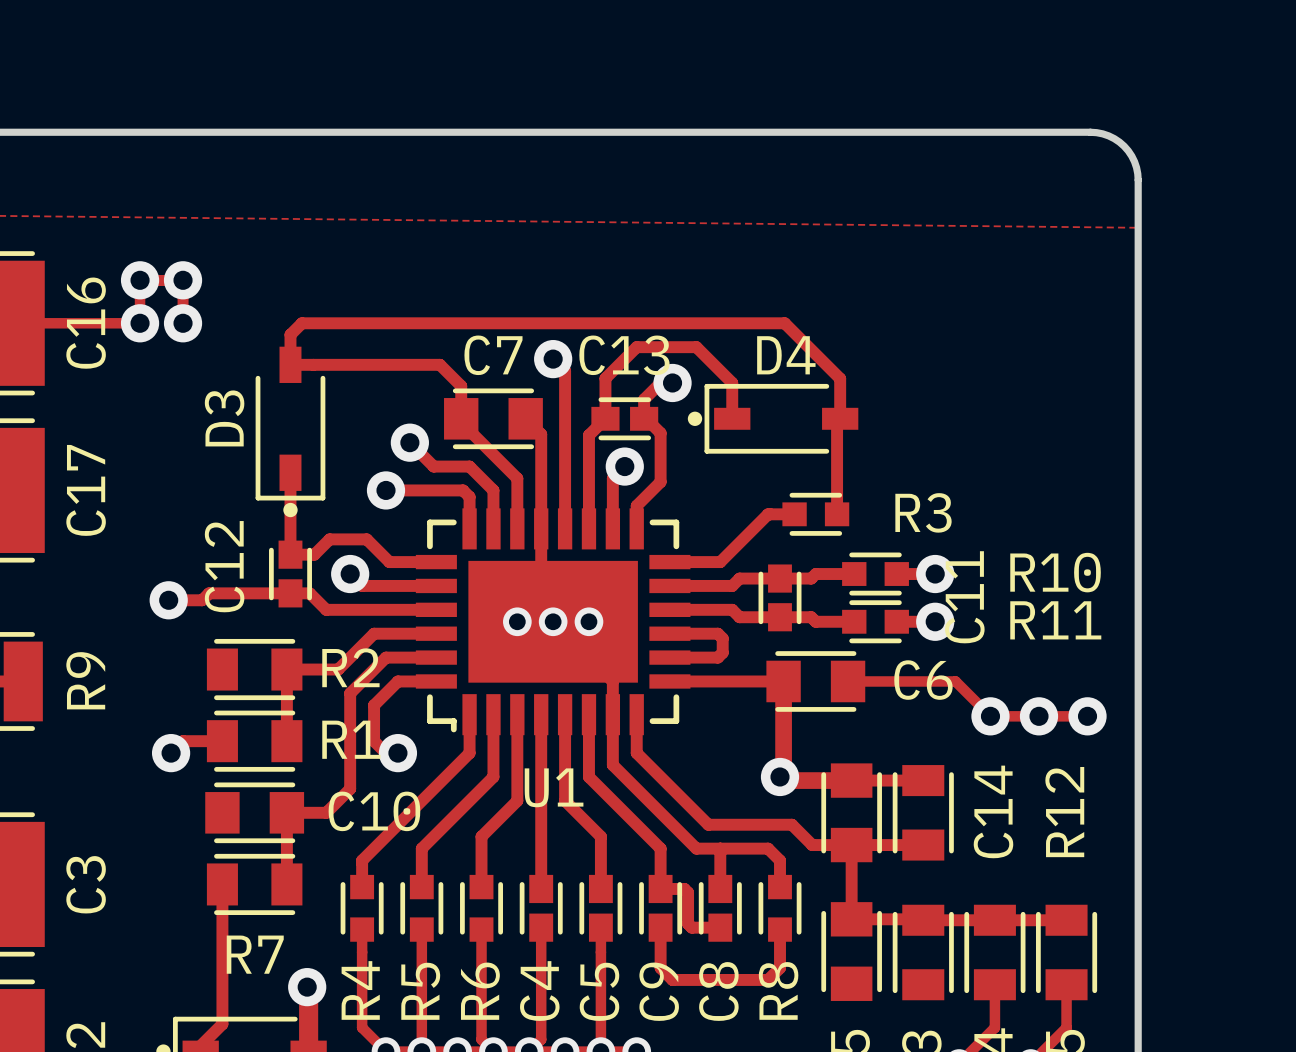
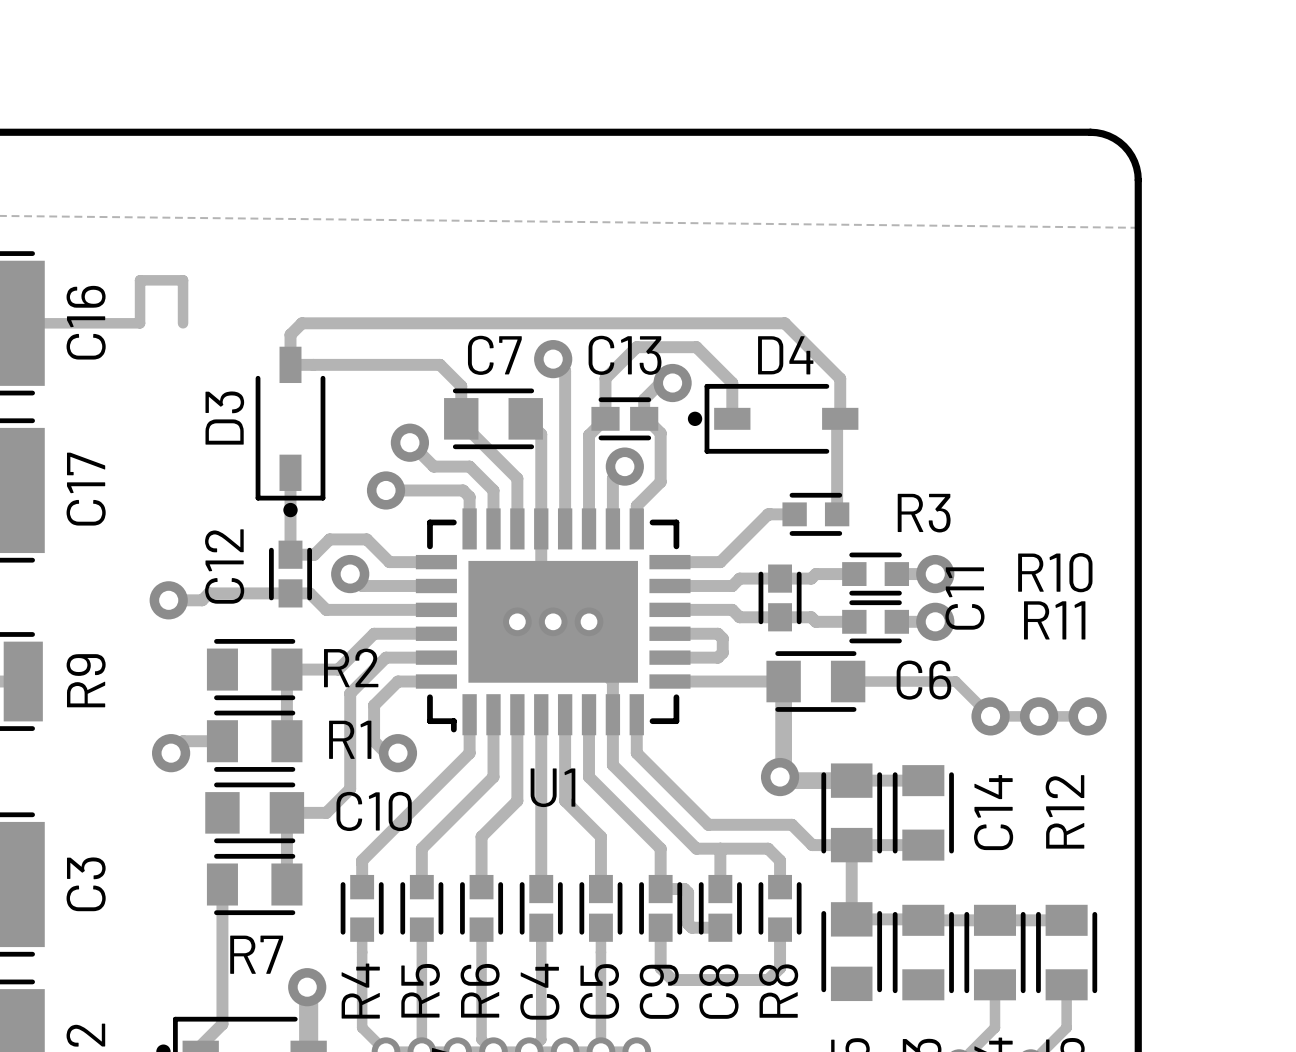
via: (140, 280) -> none
via: (183, 280) -> none
via: (140, 323) -> none
via: (183, 323) -> none

